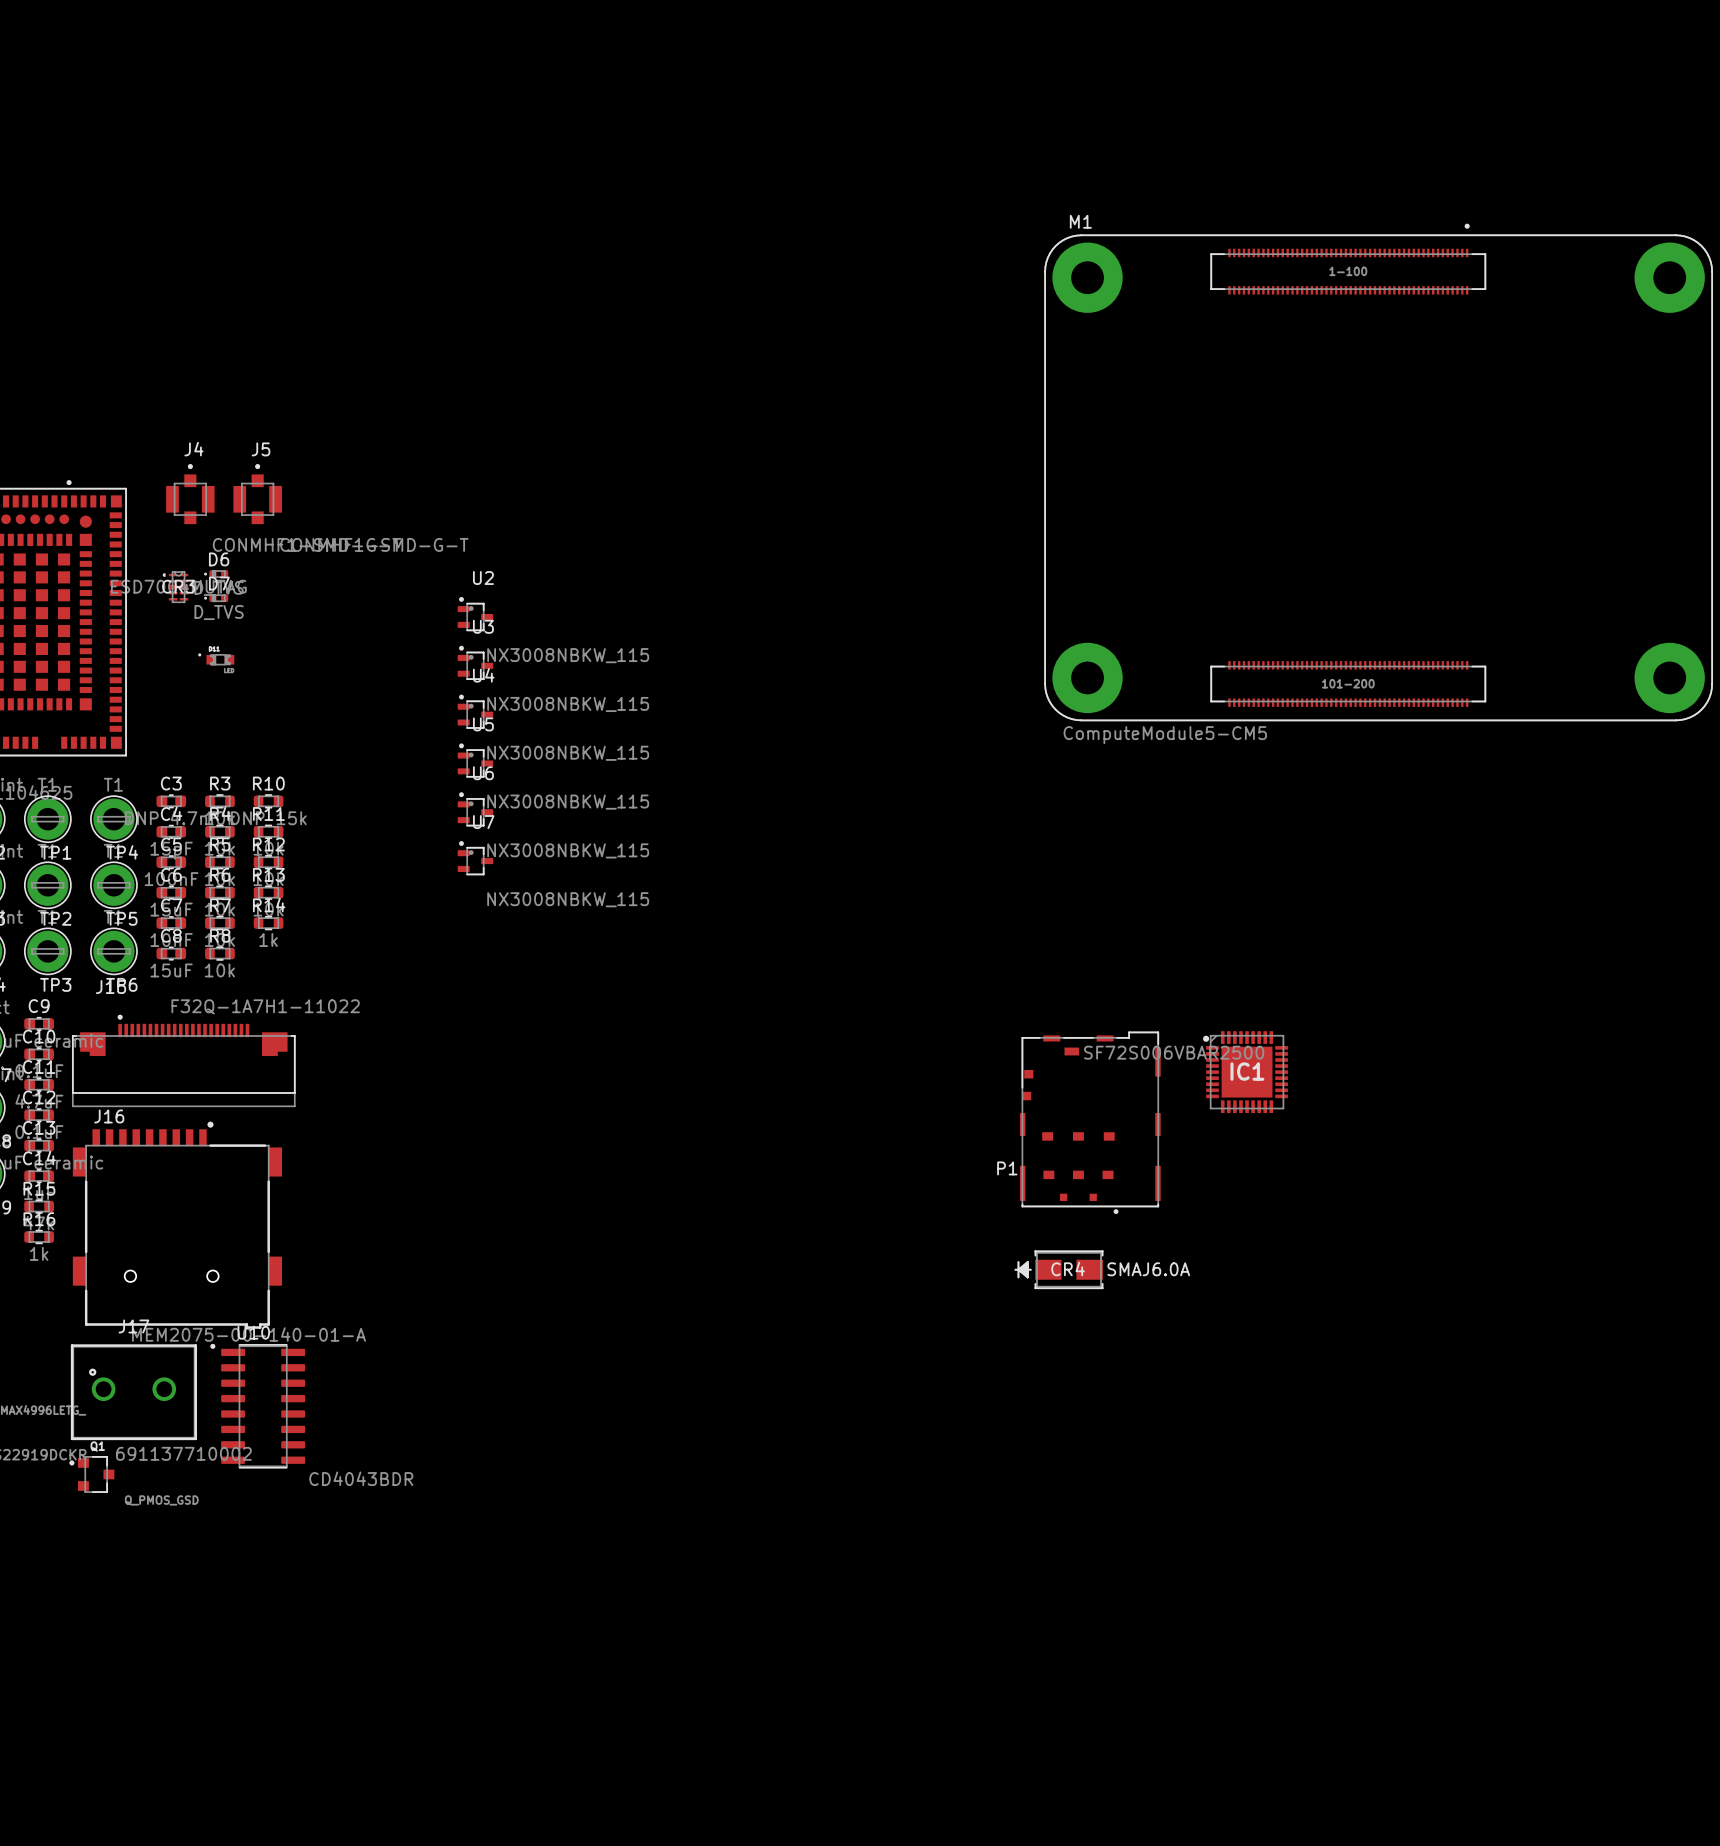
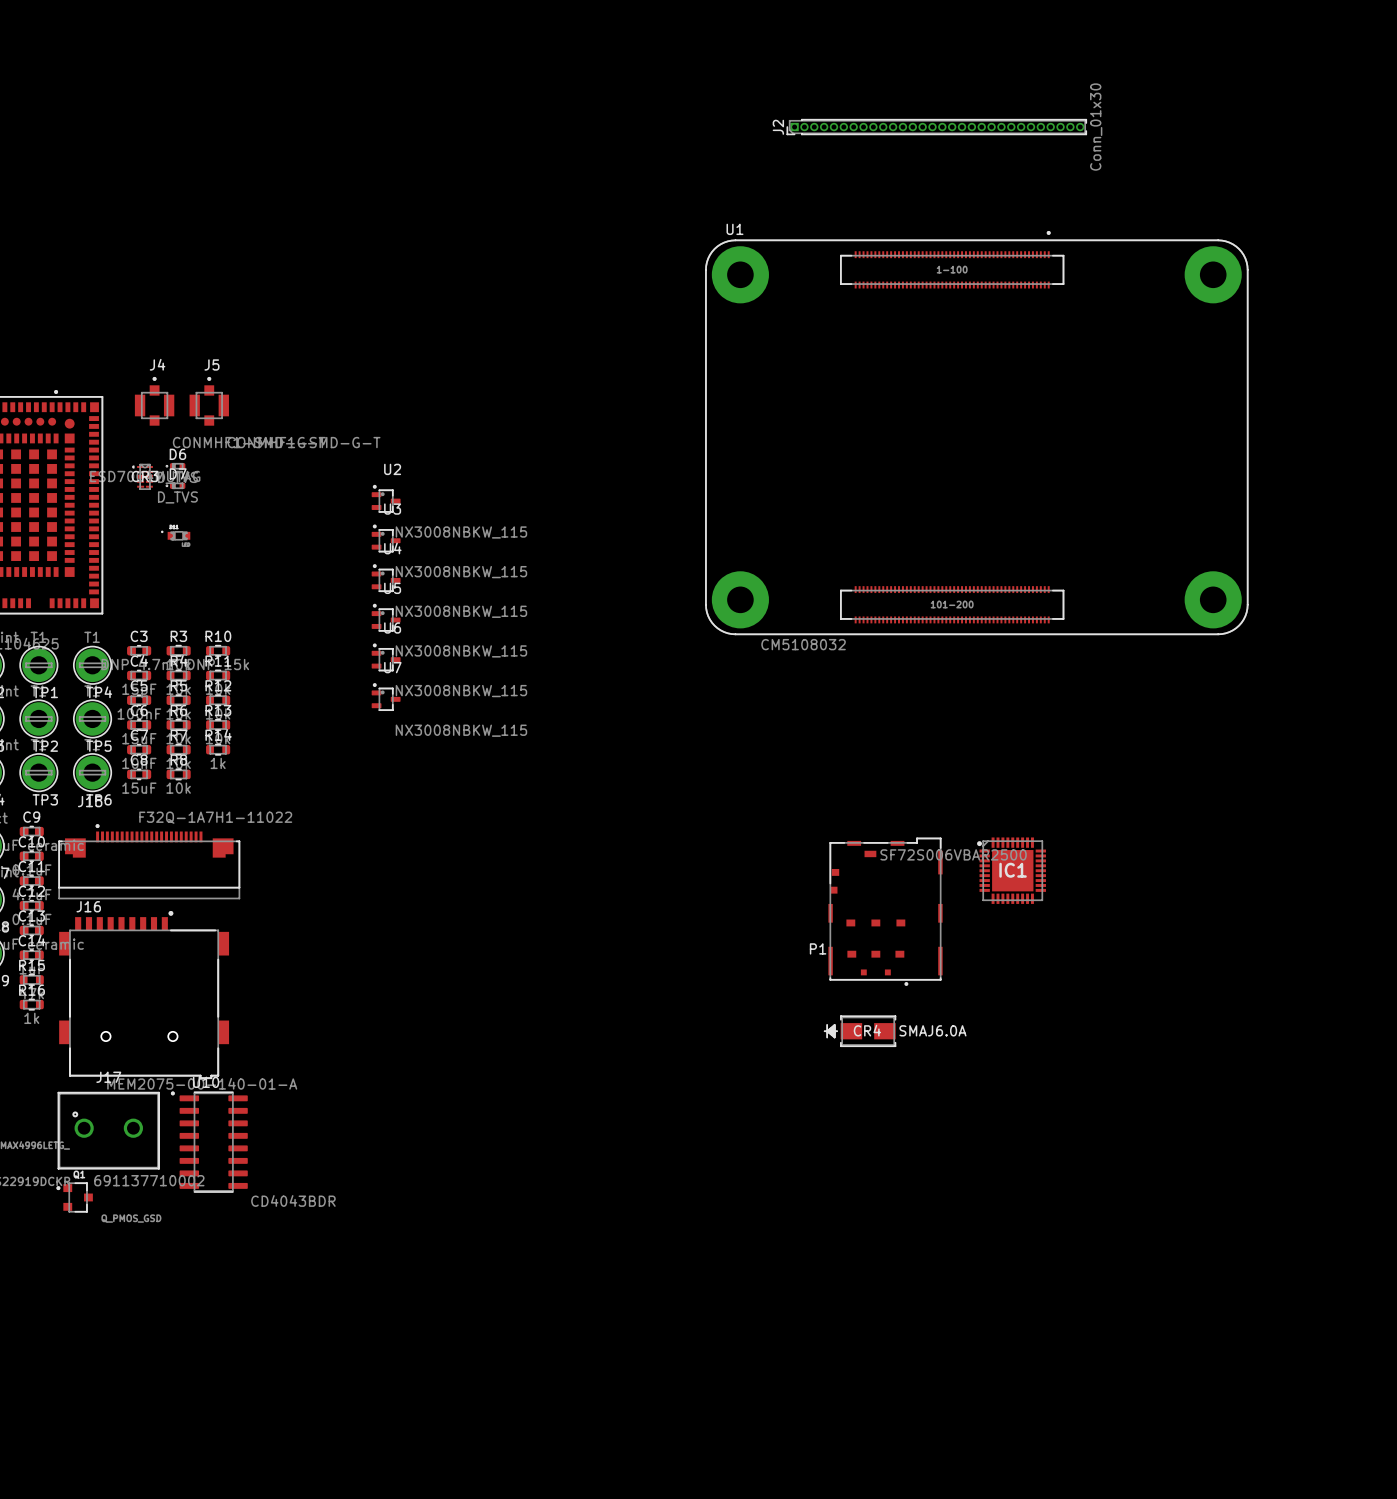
J2: none -> Conn_01x30 (936, 127)
M1: ComputeModule5-CM5 (1378, 472) -> none
U1: none -> CM5108032 (976, 432)

